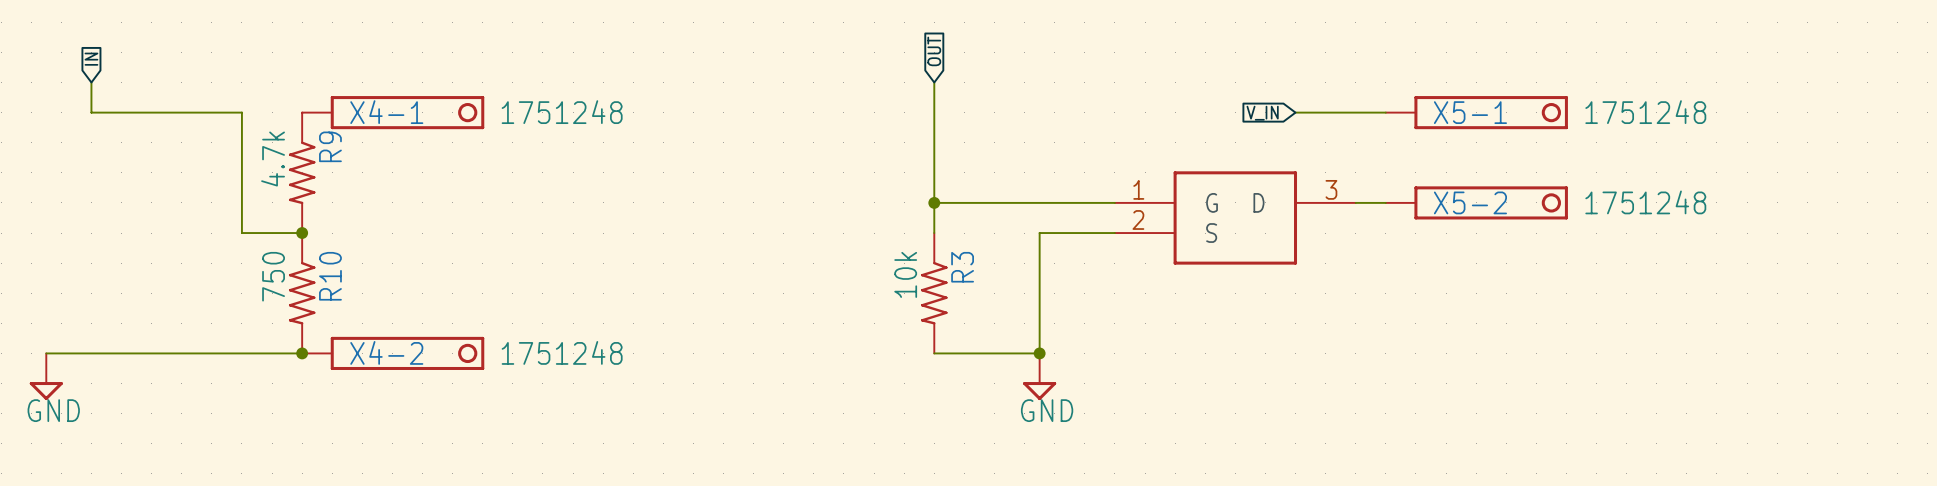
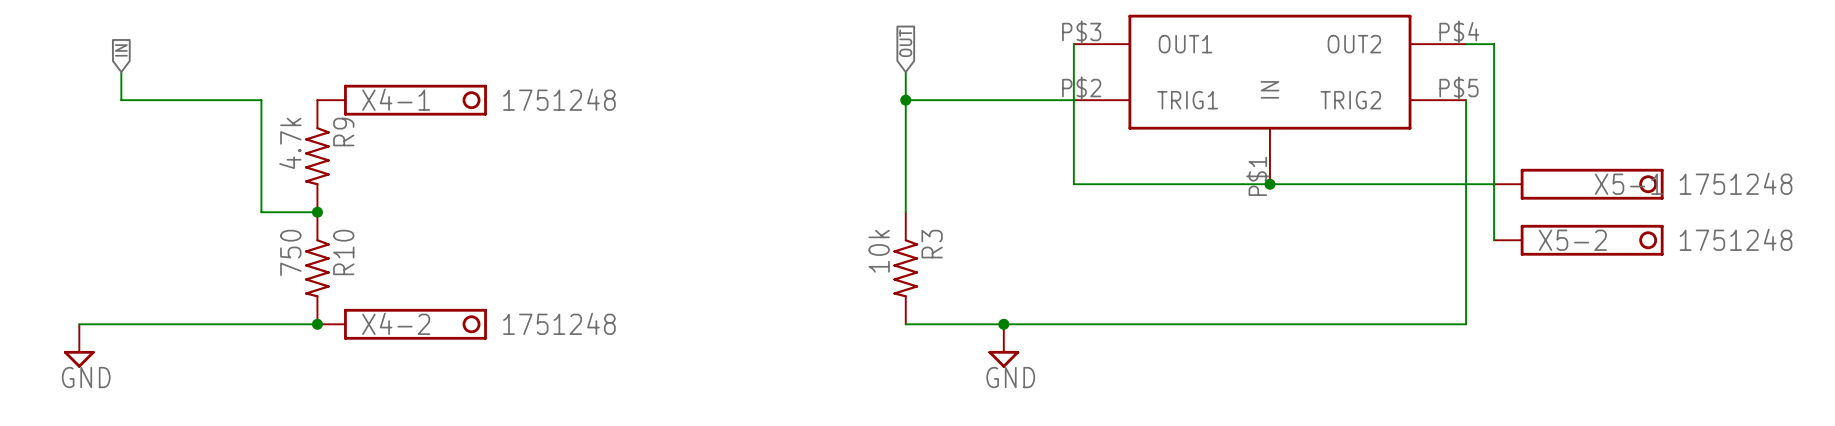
wire: none -> (1073, 44) (1073, 184) (1297, 184)
wire: none -> (1466, 44) (1494, 44) (1494, 240)
part: none -> (1269, 99)
junction: none -> (905, 100)
wire: (1295, 112) (1385, 112) -> none
X5-1 name position: X5-1 (1470, 112) -> X5-1 (1628, 184)
X5-1 position: (1476, 112) -> (1578, 184)
global label: V_IN (1262, 113) -> none
wire: (934, 202) (1114, 202) -> (905, 100) (1073, 100)
junction: (934, 202) -> none
junction: none -> (1269, 184)
wire: none -> (1325, 184) (1494, 184)
X5-2 position: (1476, 202) -> (1578, 240)
part: (1235, 217) -> none
wire: (1114, 233) (1039, 233) (1039, 353) -> (1466, 100) (1466, 324) (1003, 324)

